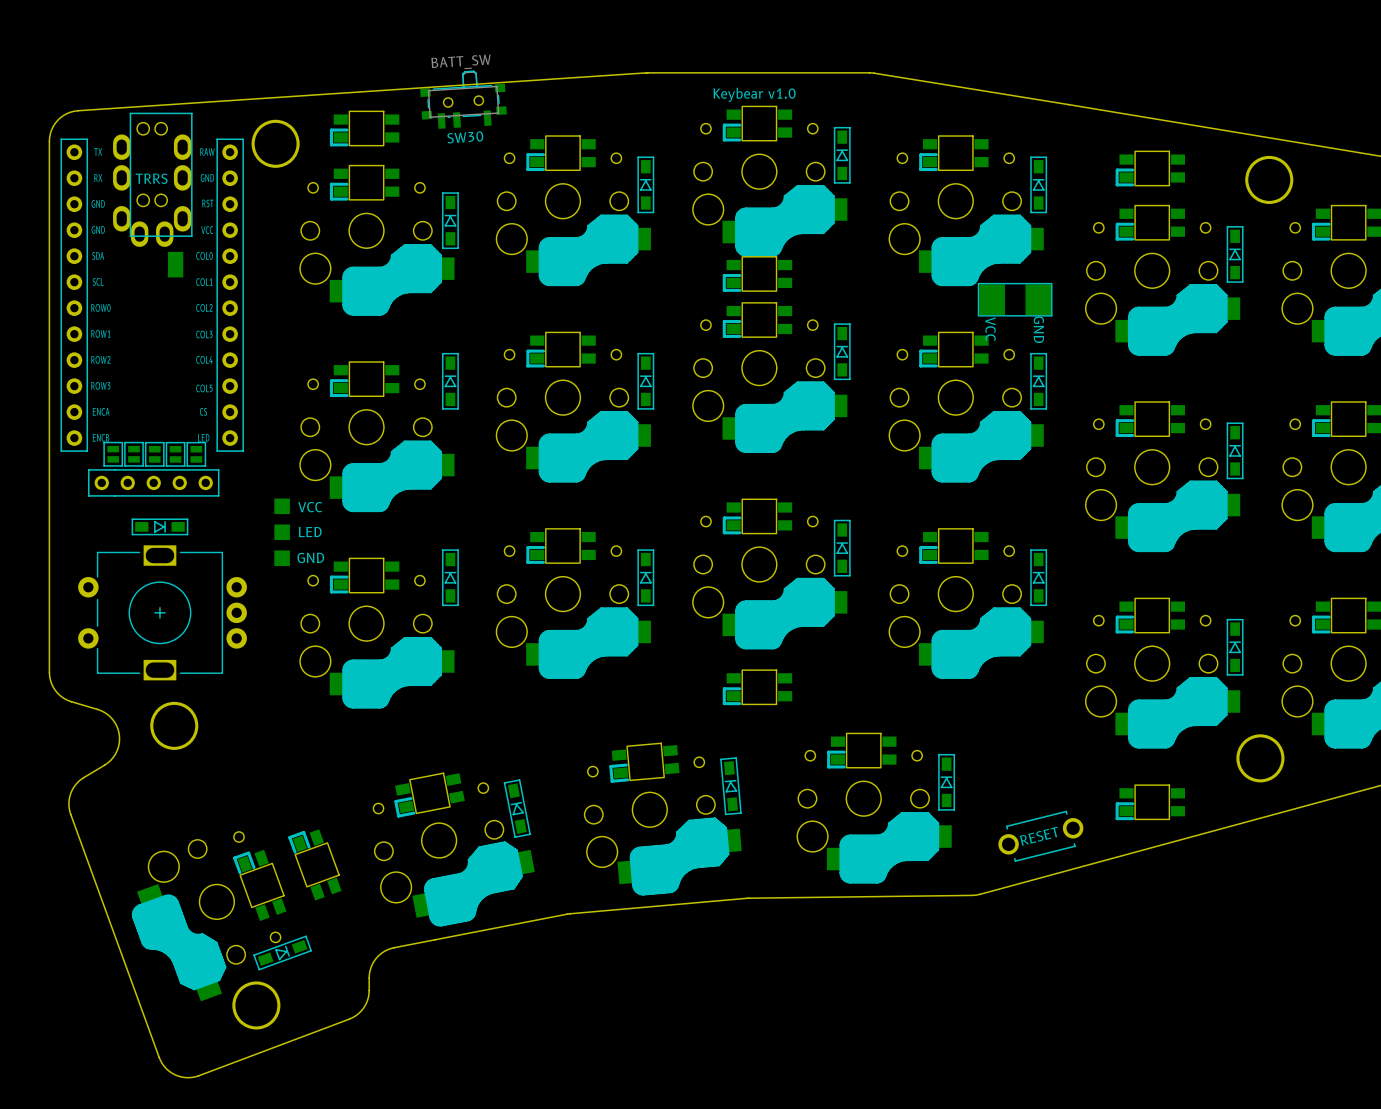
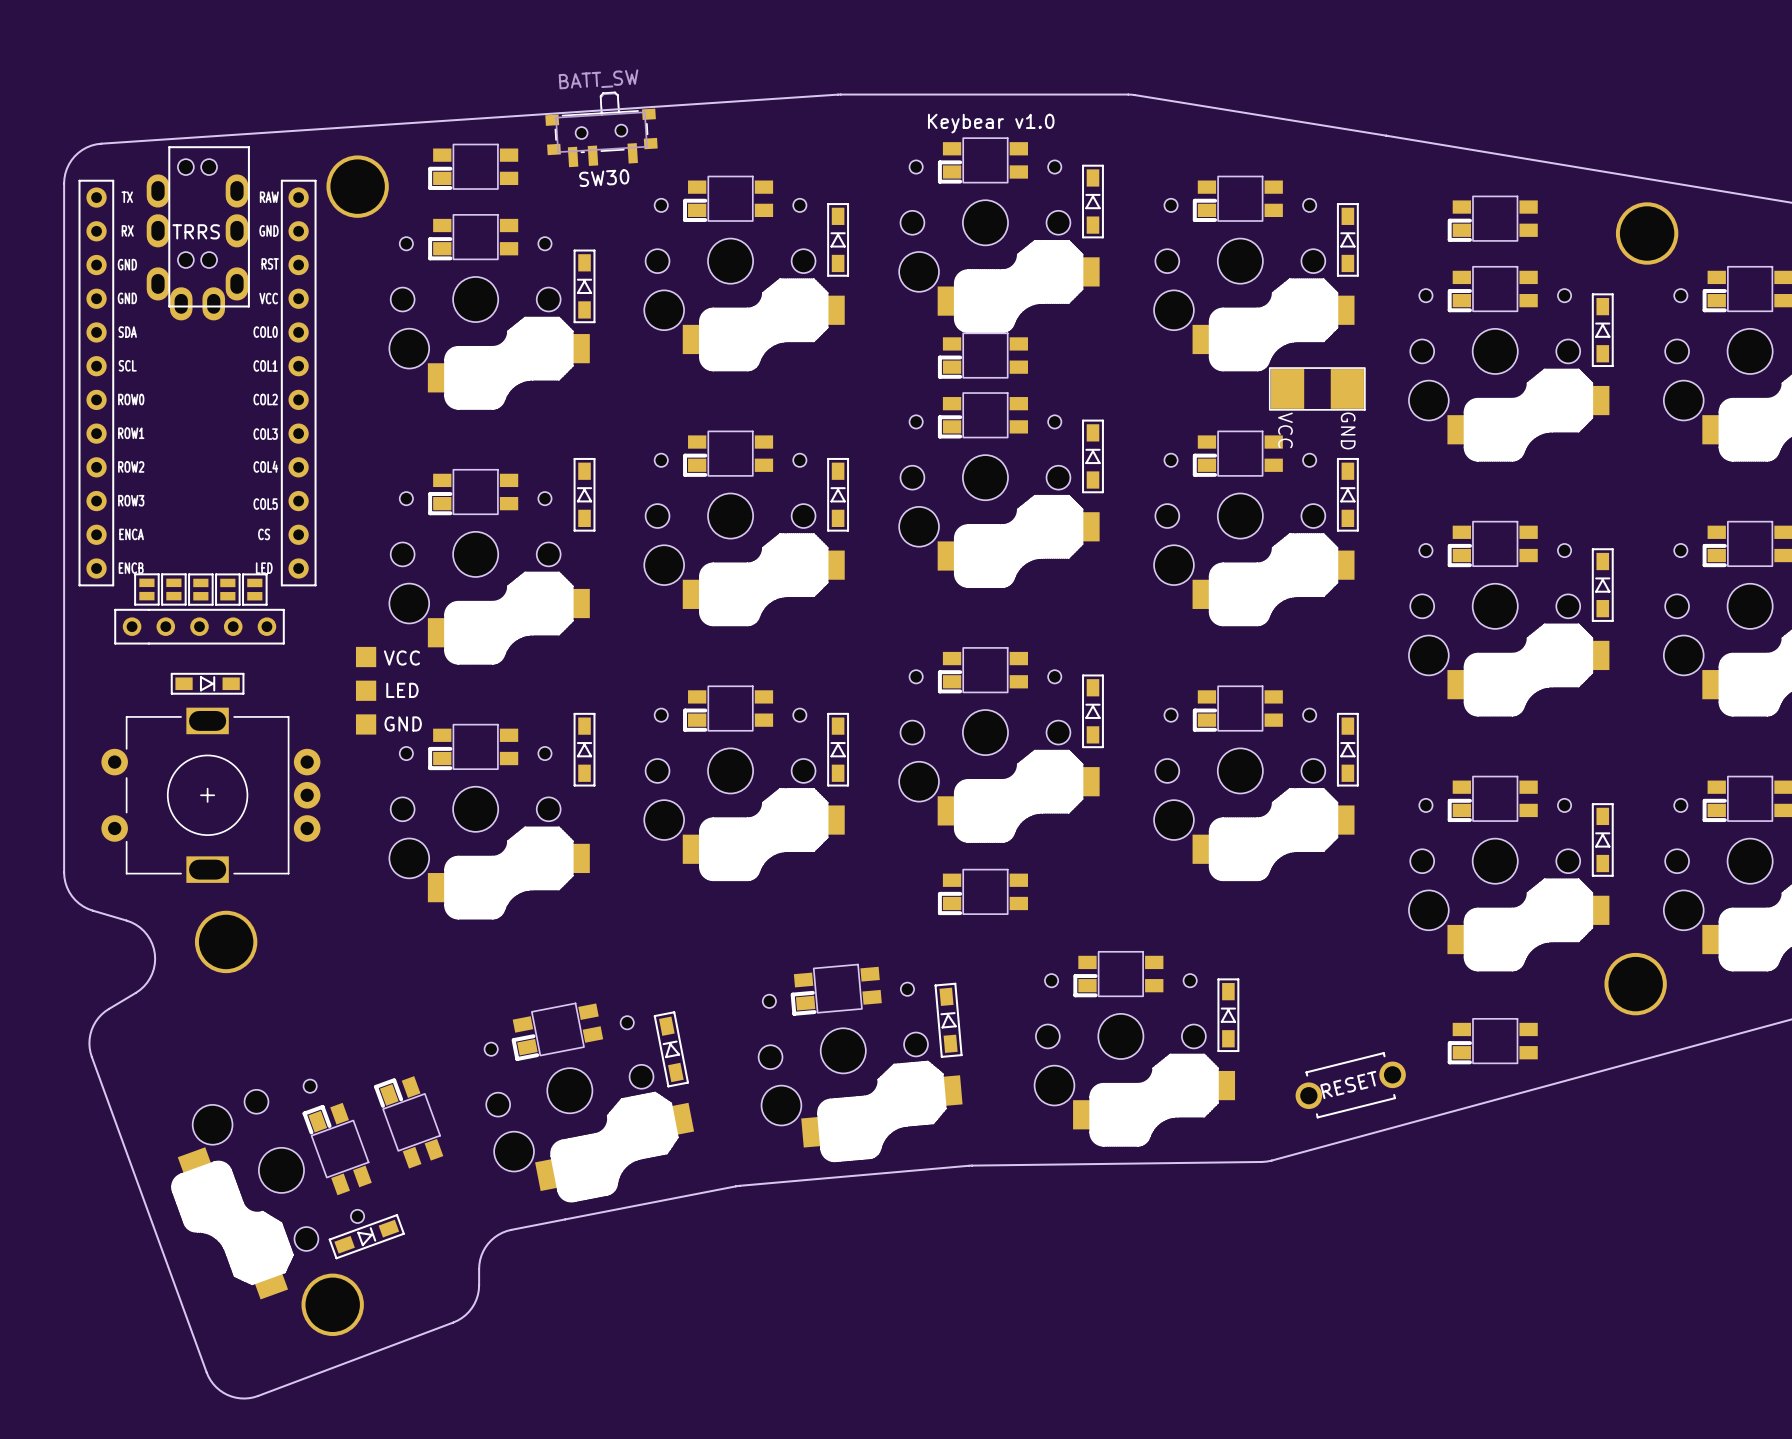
part: (175, 264) -> none

